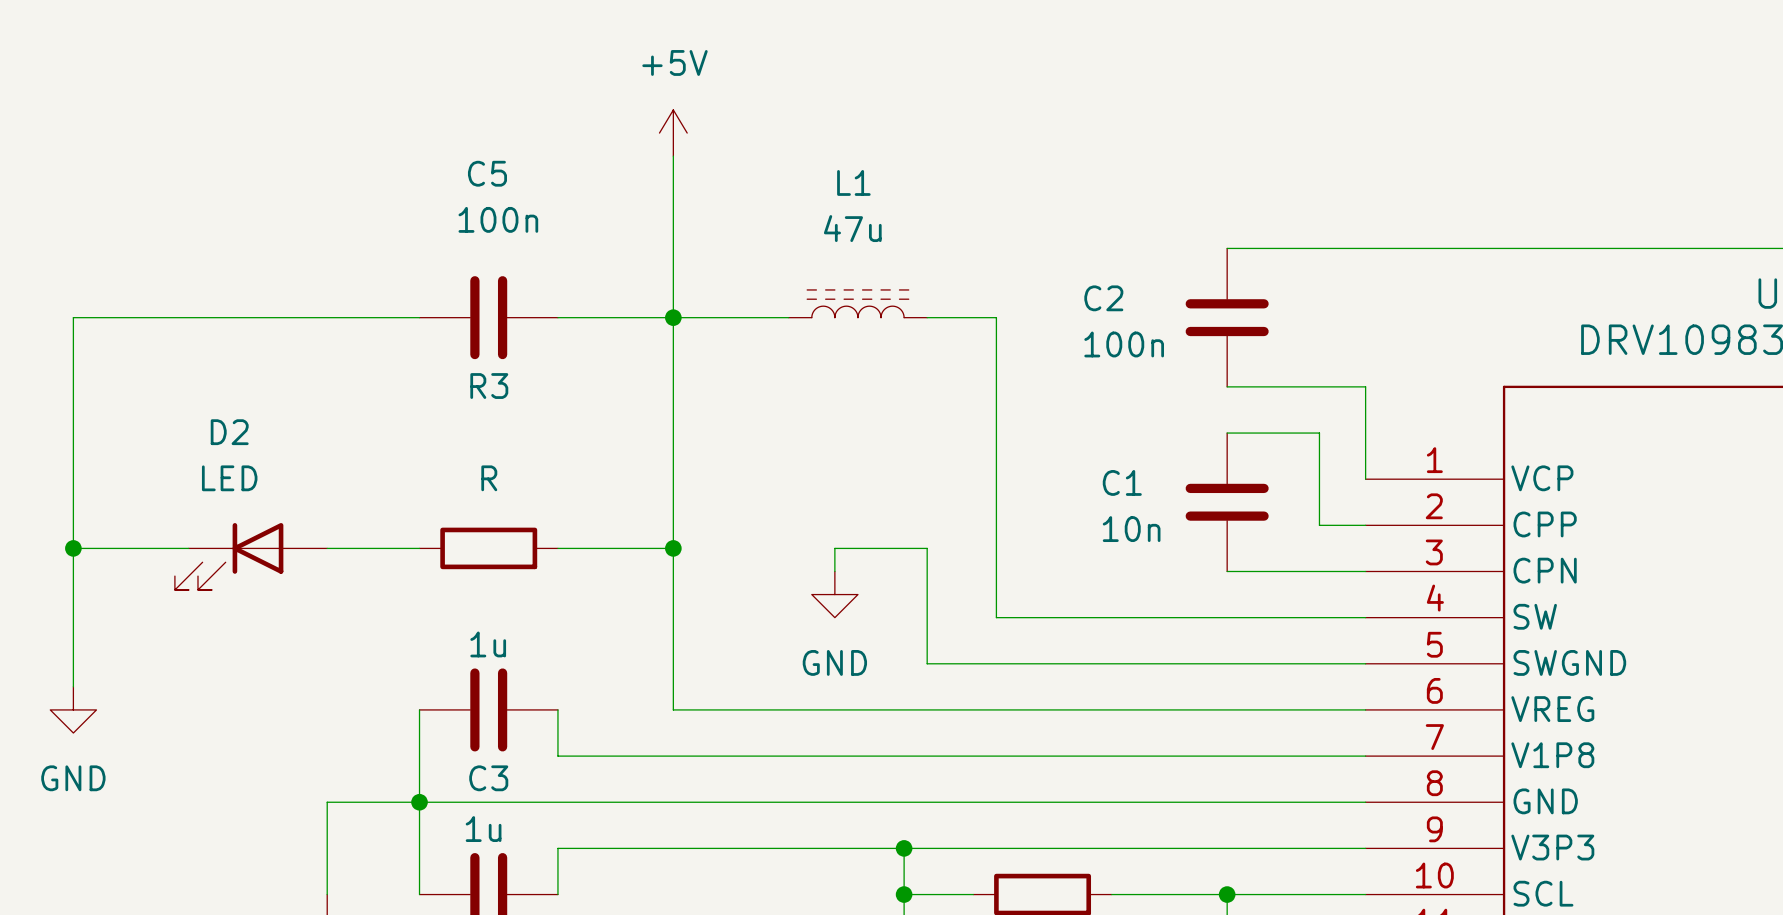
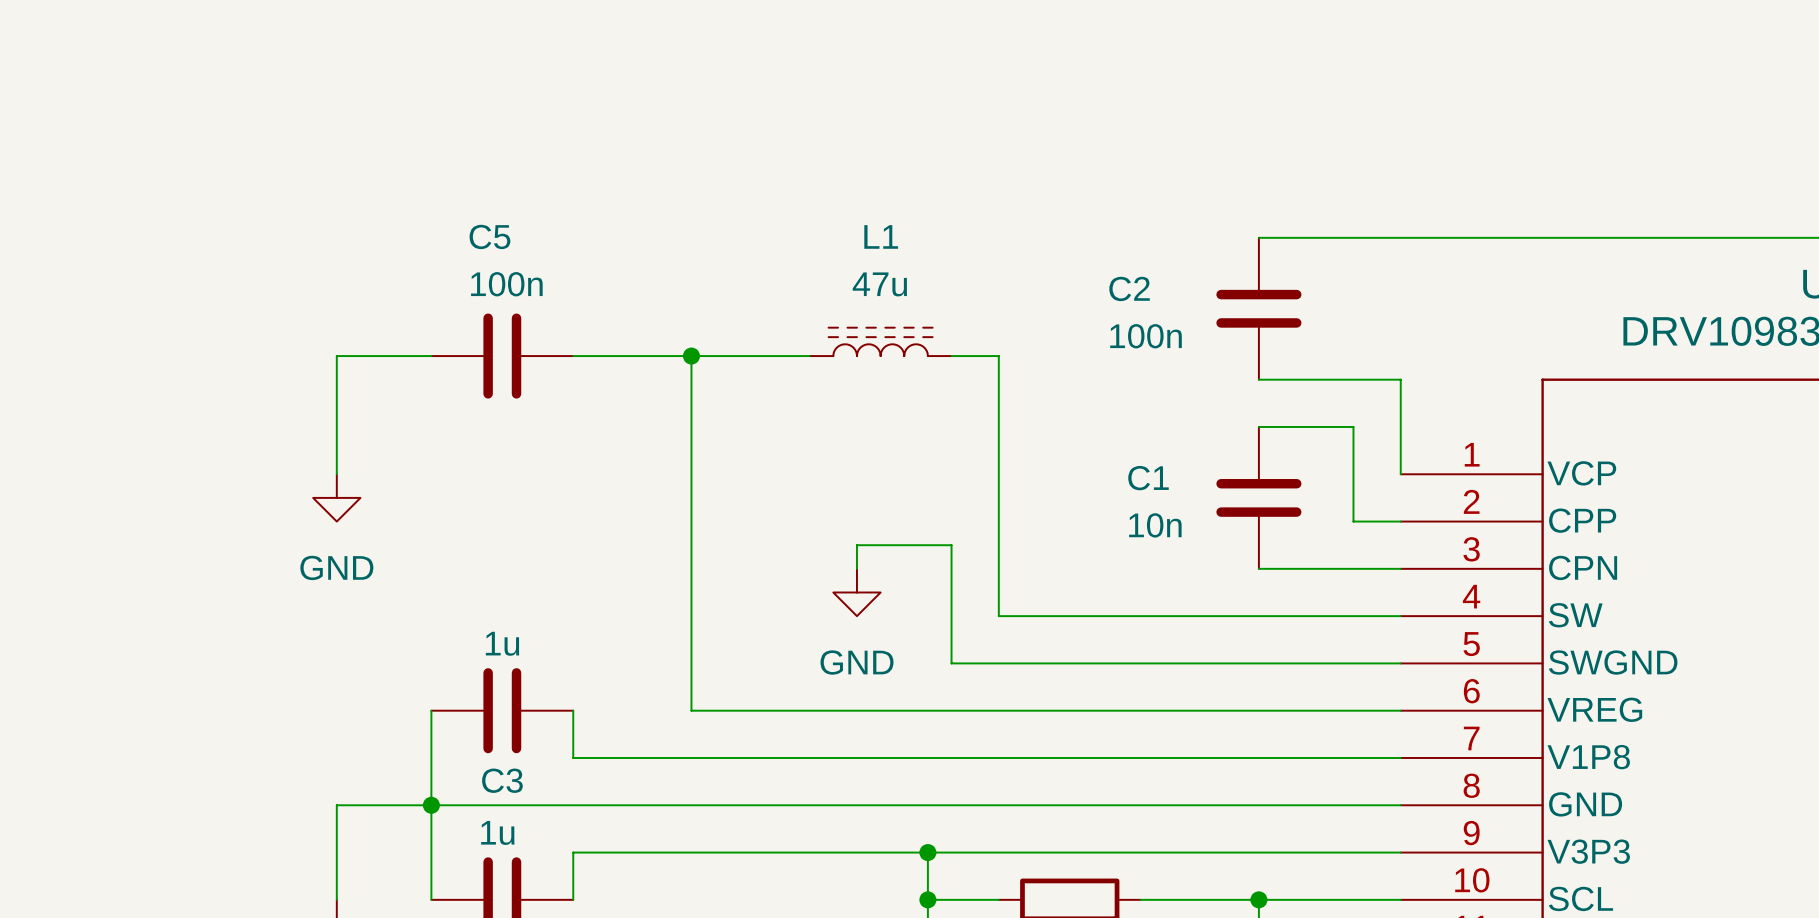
power symbol: +5V (673, 133) -> none
wire: (673, 156) (673, 363) -> none
C5 name position: C5 (487, 173) -> C5 (489, 236)
L1 name position: L1 (853, 182) -> L1 (881, 236)
C5 value position: 100n (498, 219) -> 100n (506, 284)
L1 value position: 47u (852, 228) -> 47u (879, 284)
L1 position: (857, 303) -> (880, 341)
wire: (419, 317) (73, 317) (73, 686) -> none
C5 position: (488, 317) -> (502, 356)
wire: (557, 317) (788, 317) -> (573, 356) (809, 356)
junction position: (673, 317) -> (691, 356)
wire: (927, 317) (996, 317) (996, 617) -> (951, 356) (998, 356) (998, 616) (1022, 616)
wire: none -> (431, 356) (336, 356) (336, 474)
wire: (73, 548) (188, 548) -> none
junction: (73, 548) -> none
wire: (327, 548) (419, 548) -> none
R3: R (488, 548) -> none
wire: (557, 548) (673, 548) -> none
junction: (673, 548) -> none
D2: LED (251, 556) -> none
power symbol position: GND (73, 709) -> GND (336, 497)

